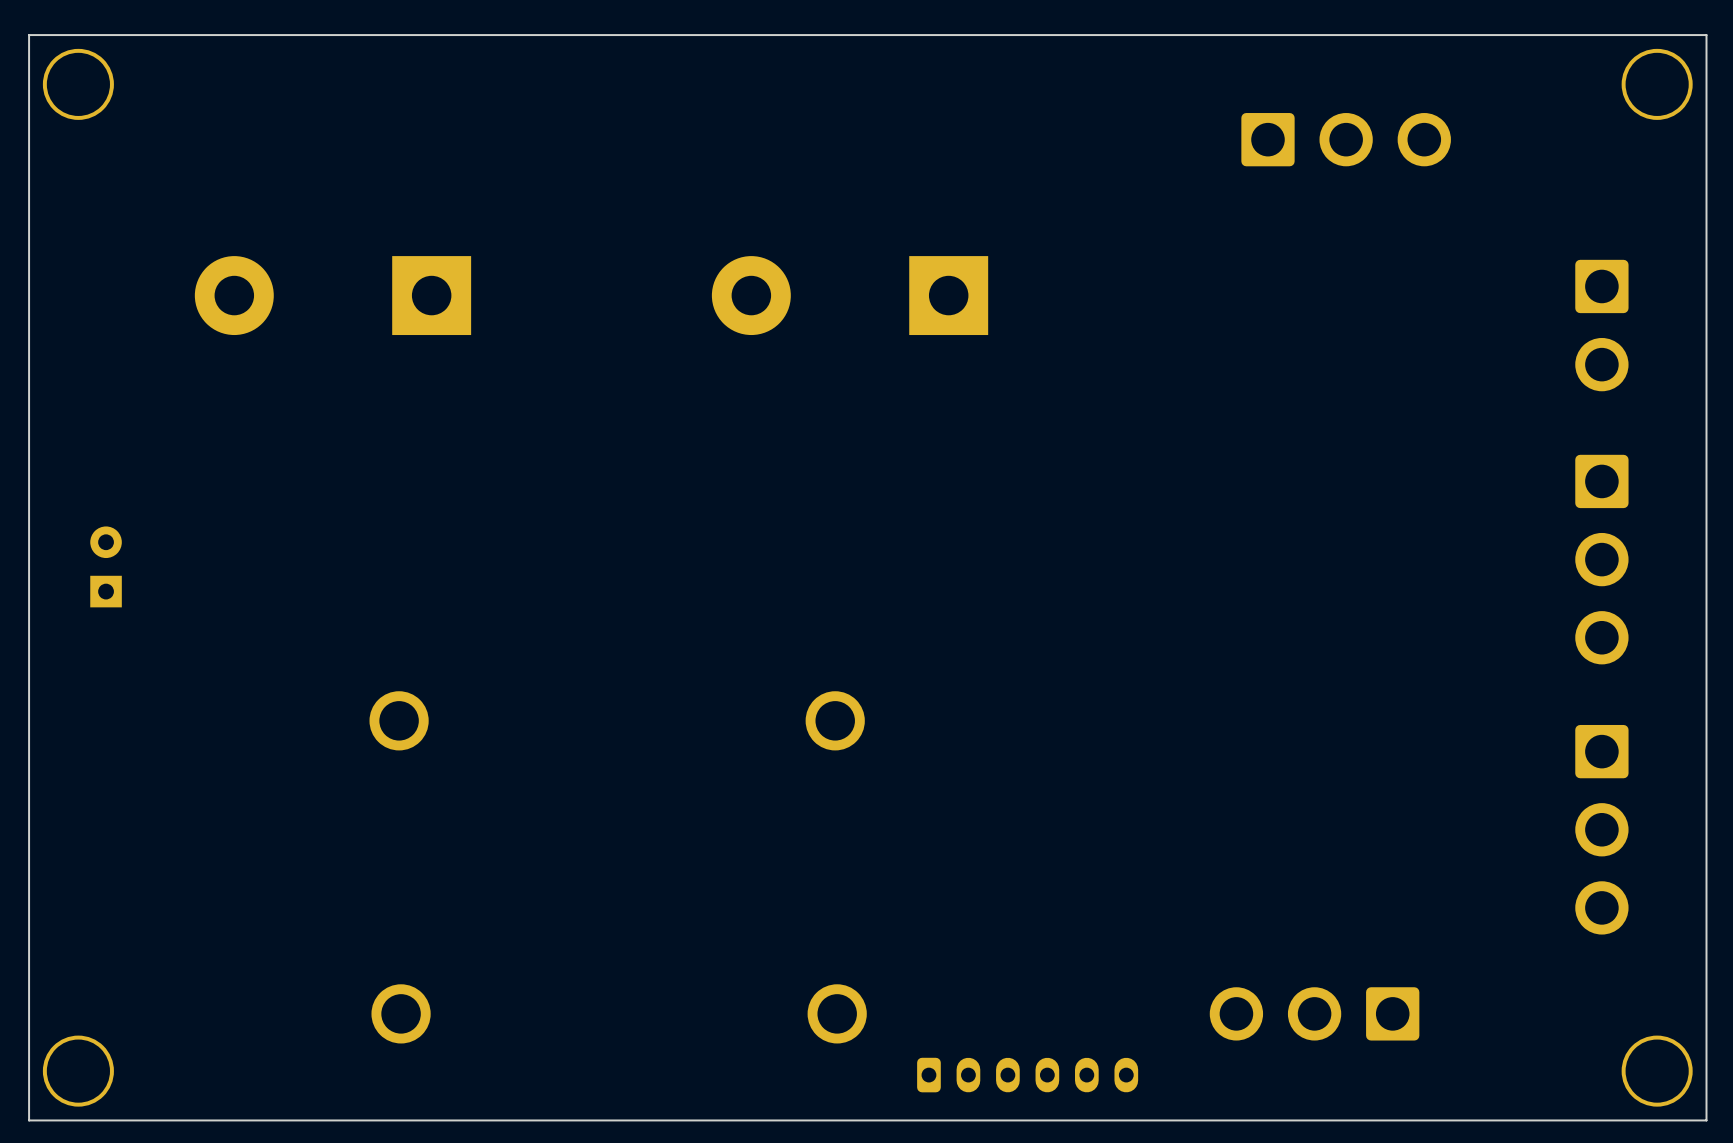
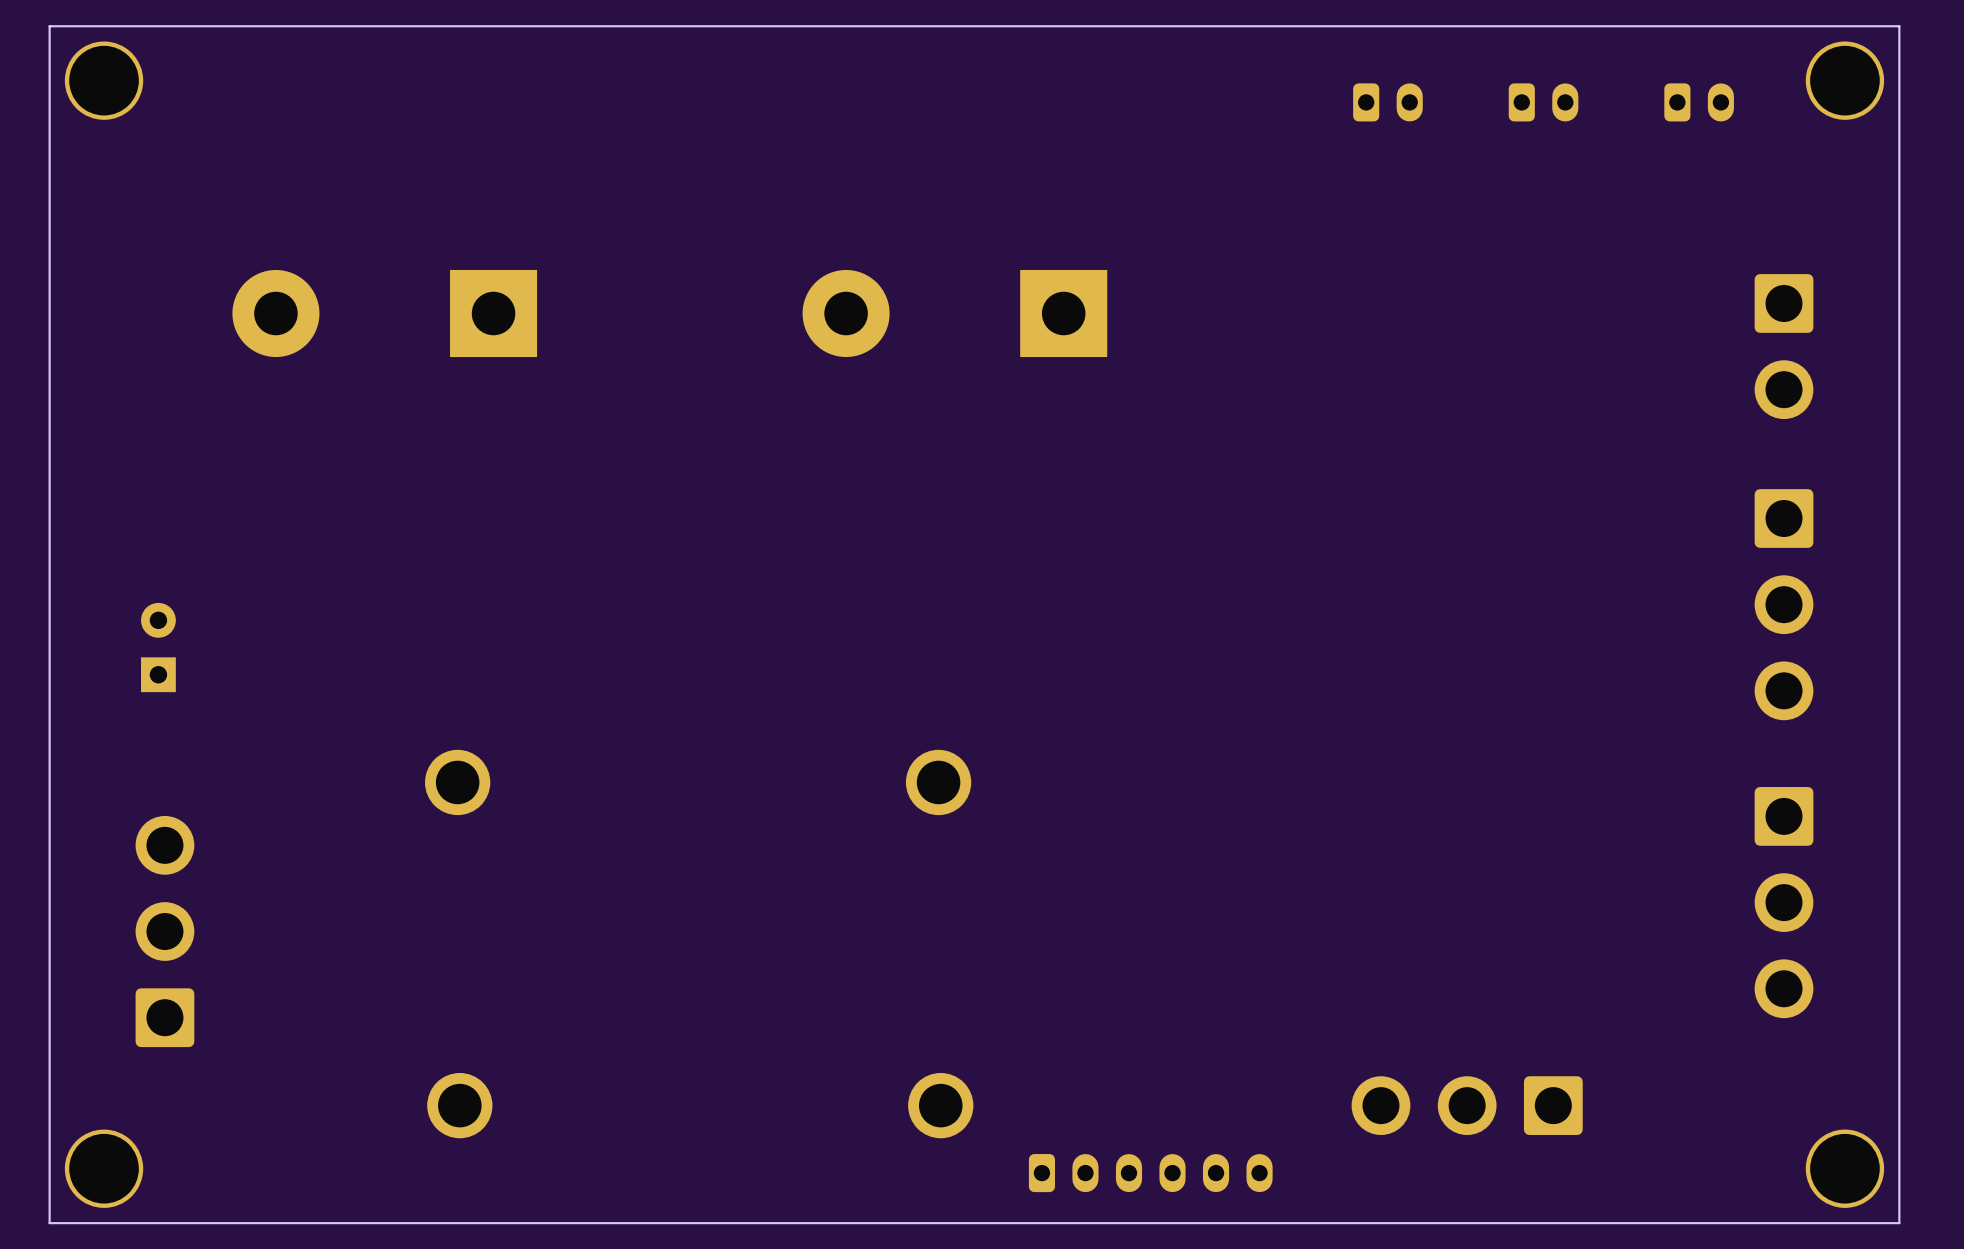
part: none -> (1387, 102)
part: none -> (1543, 102)
part: none -> (1699, 102)
part: (1346, 139) -> none
part position: (106, 566) -> (158, 647)
part: none -> (164, 931)

